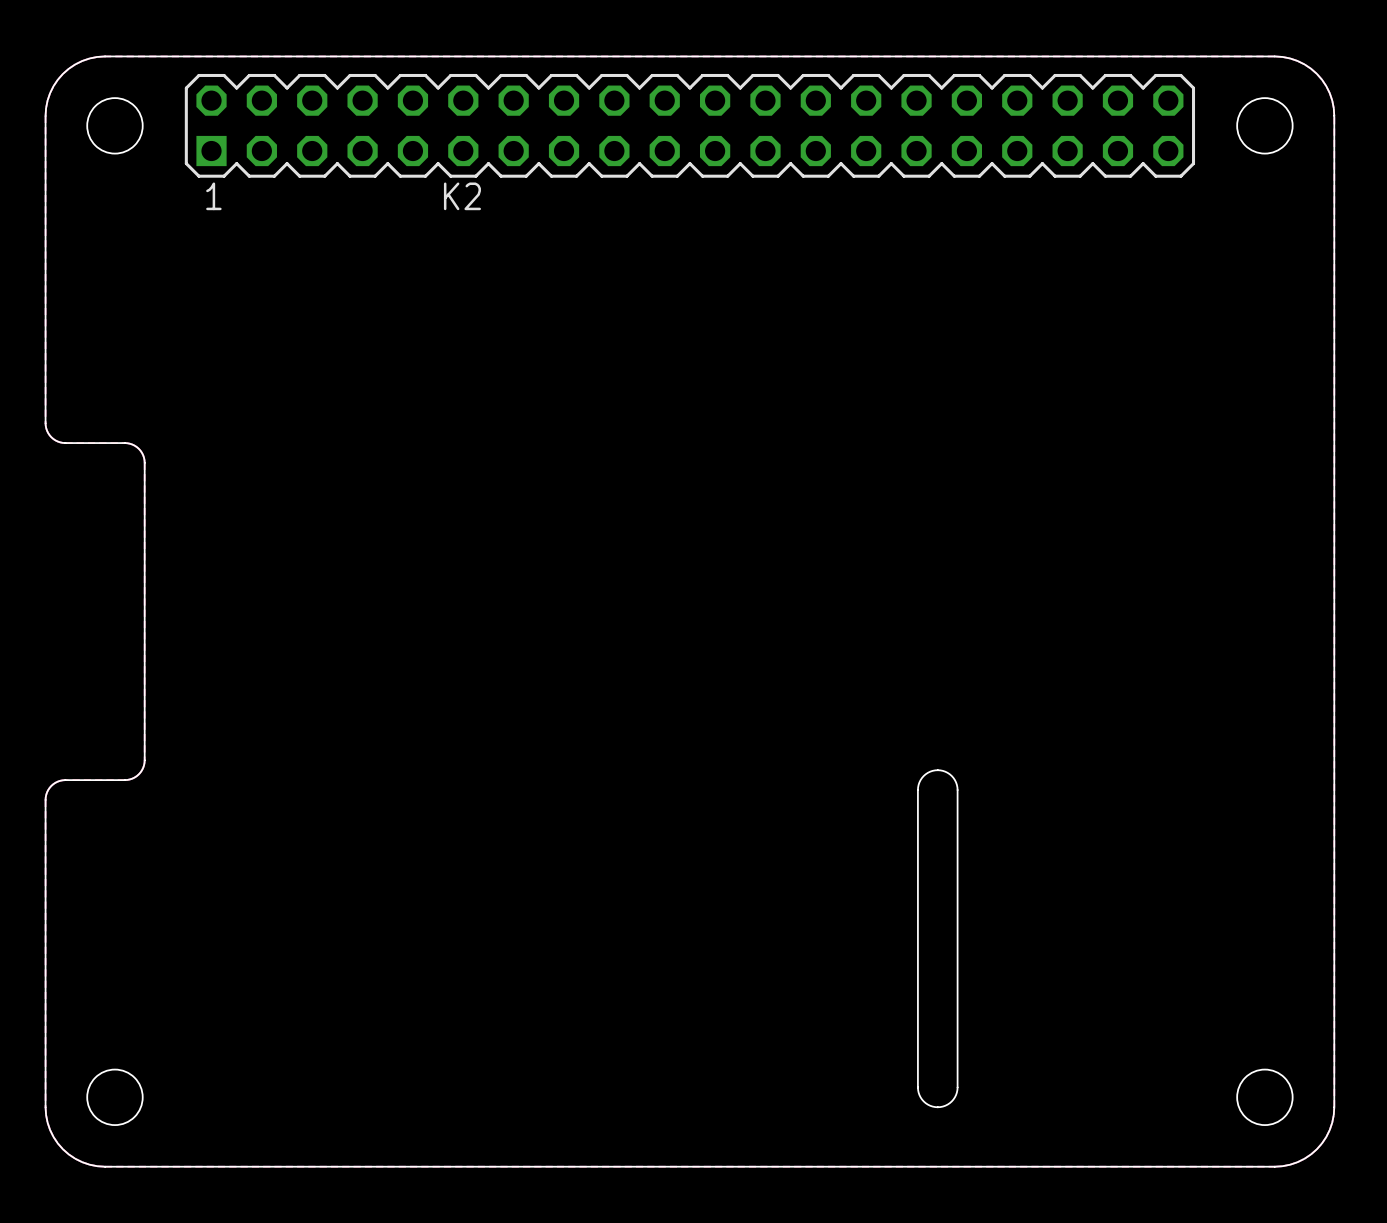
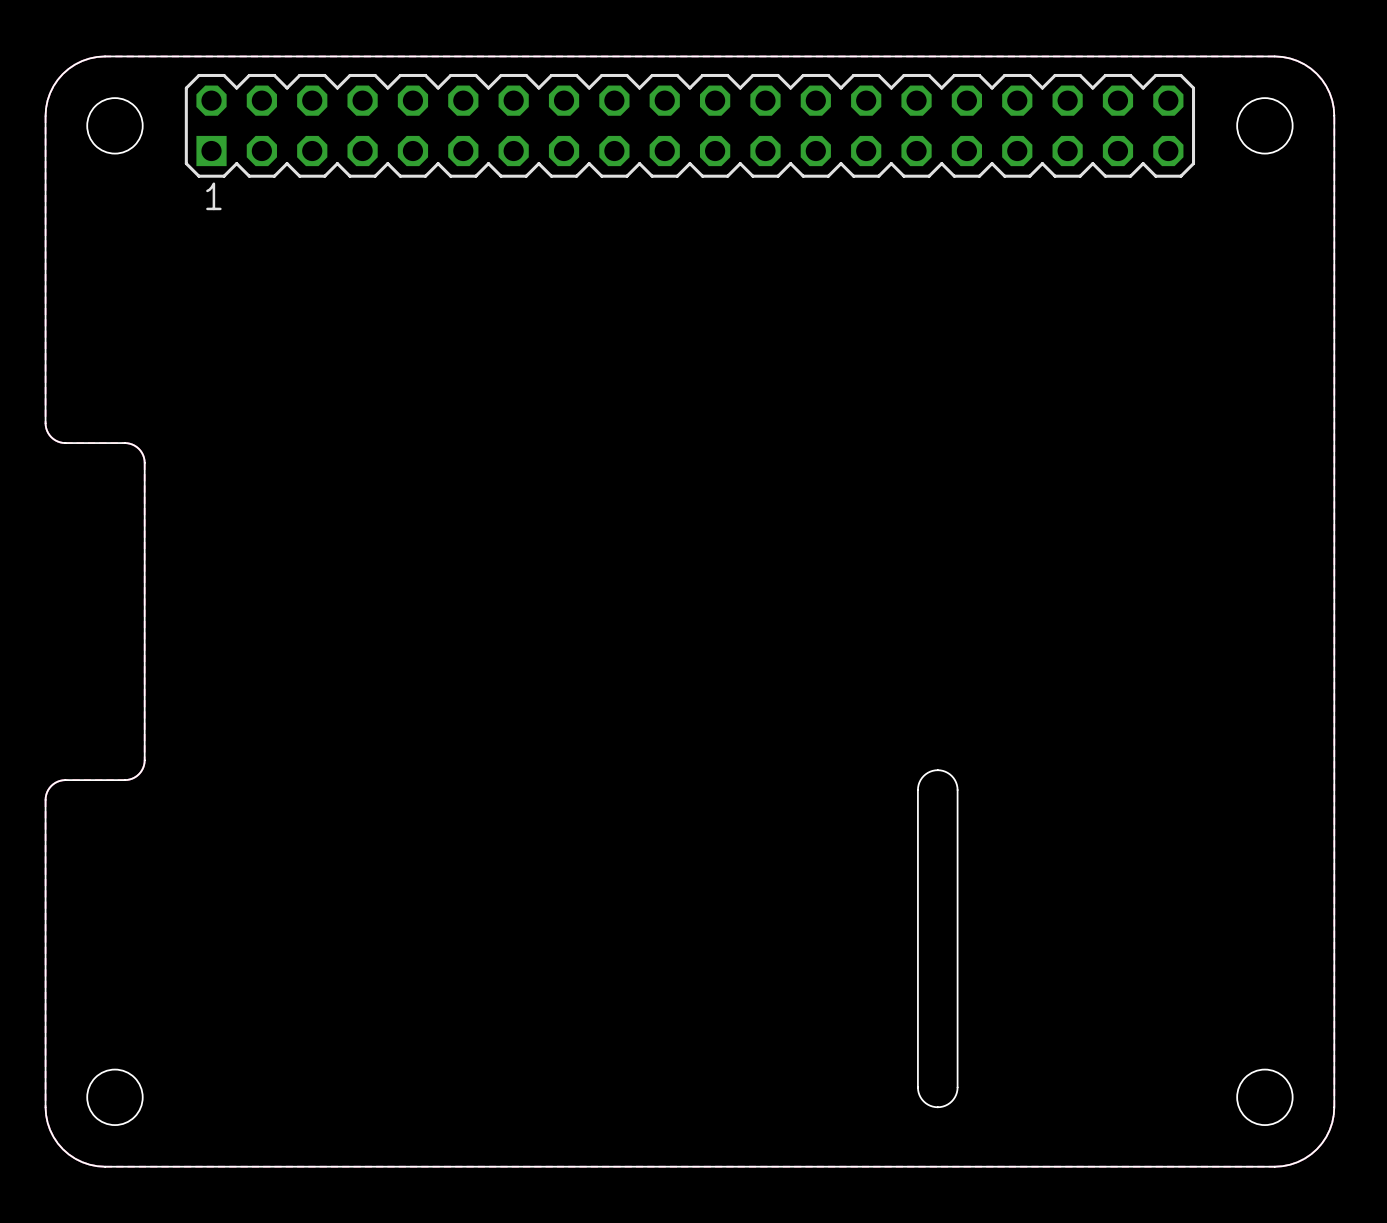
K2 name: K2 (462, 196) -> none

